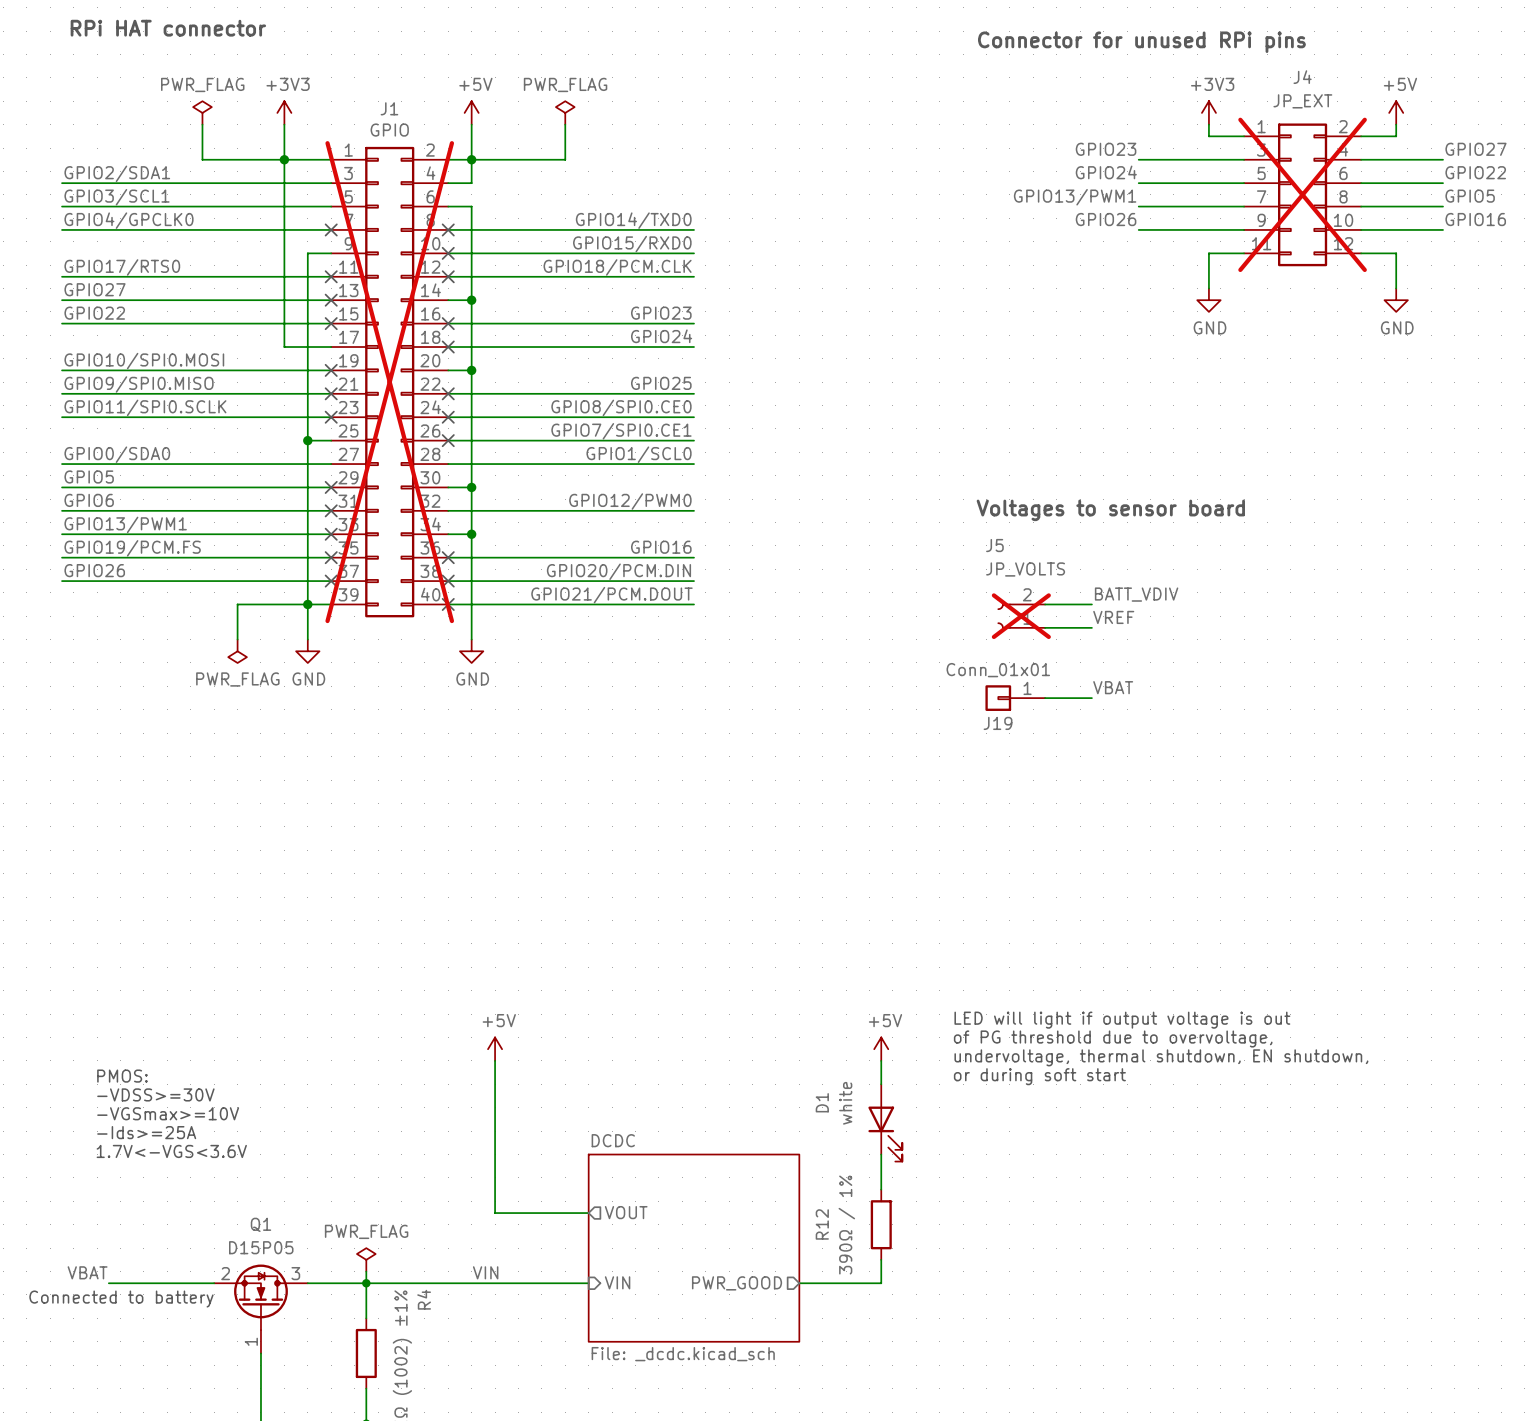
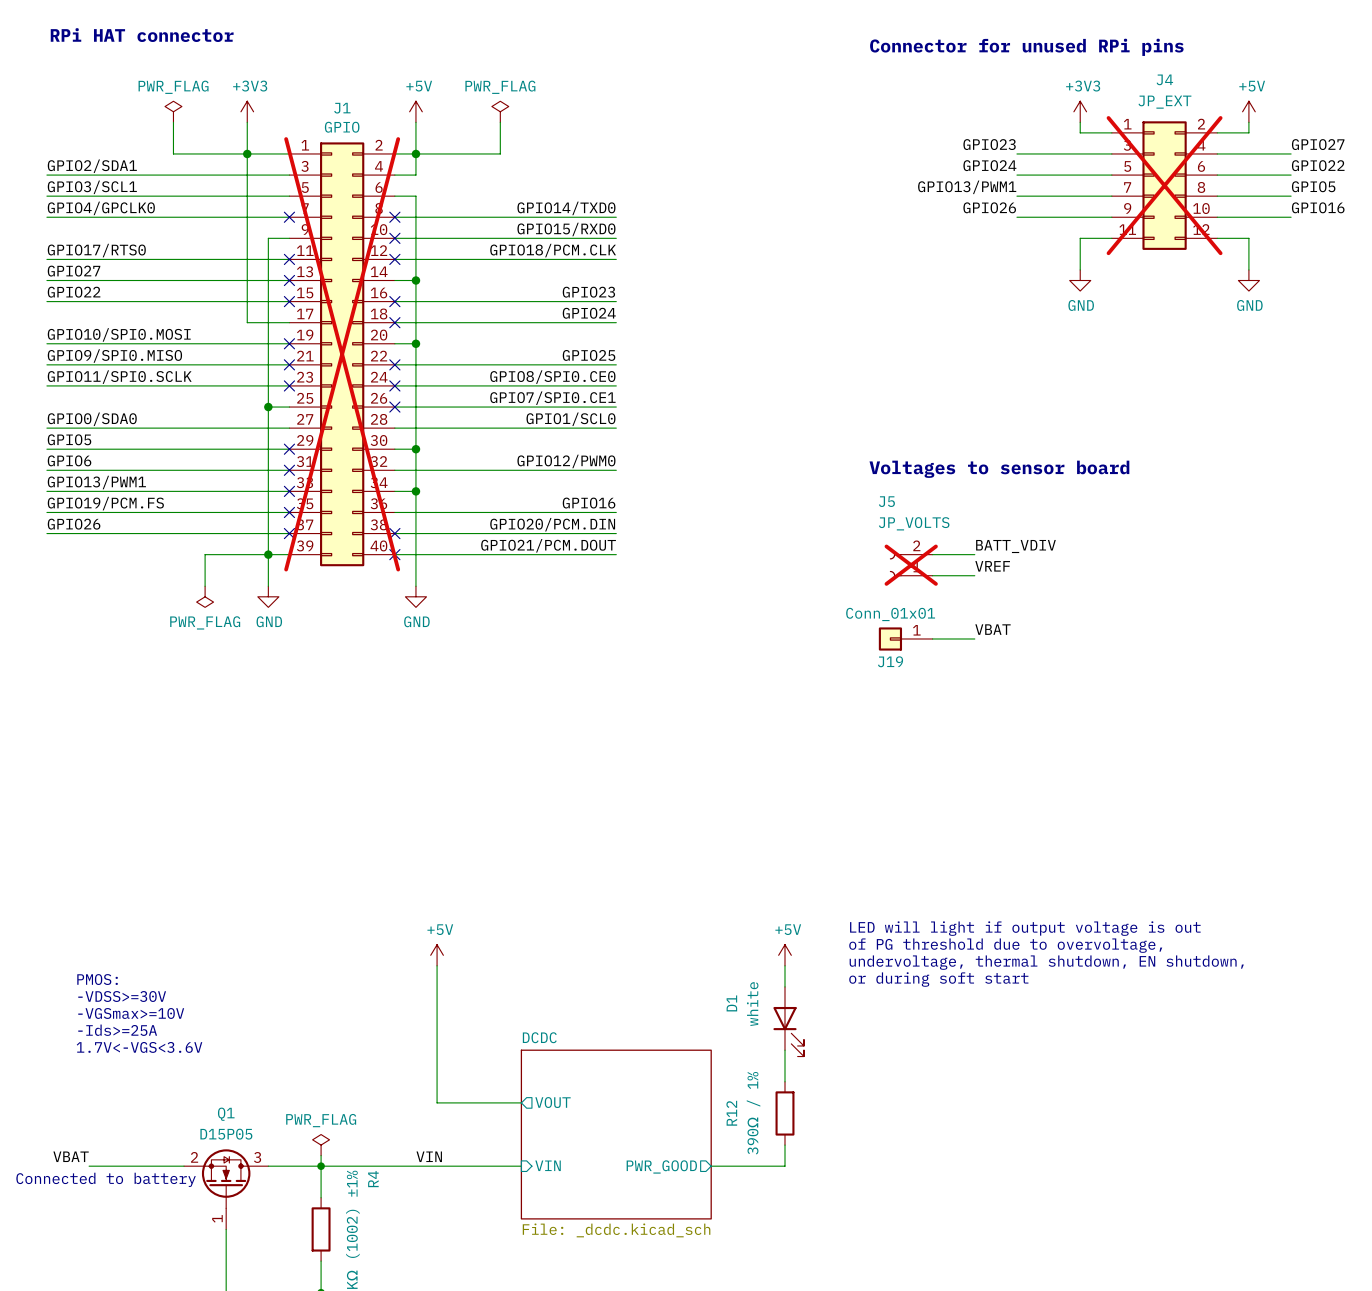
no-connect mark: (448, 557) -> none

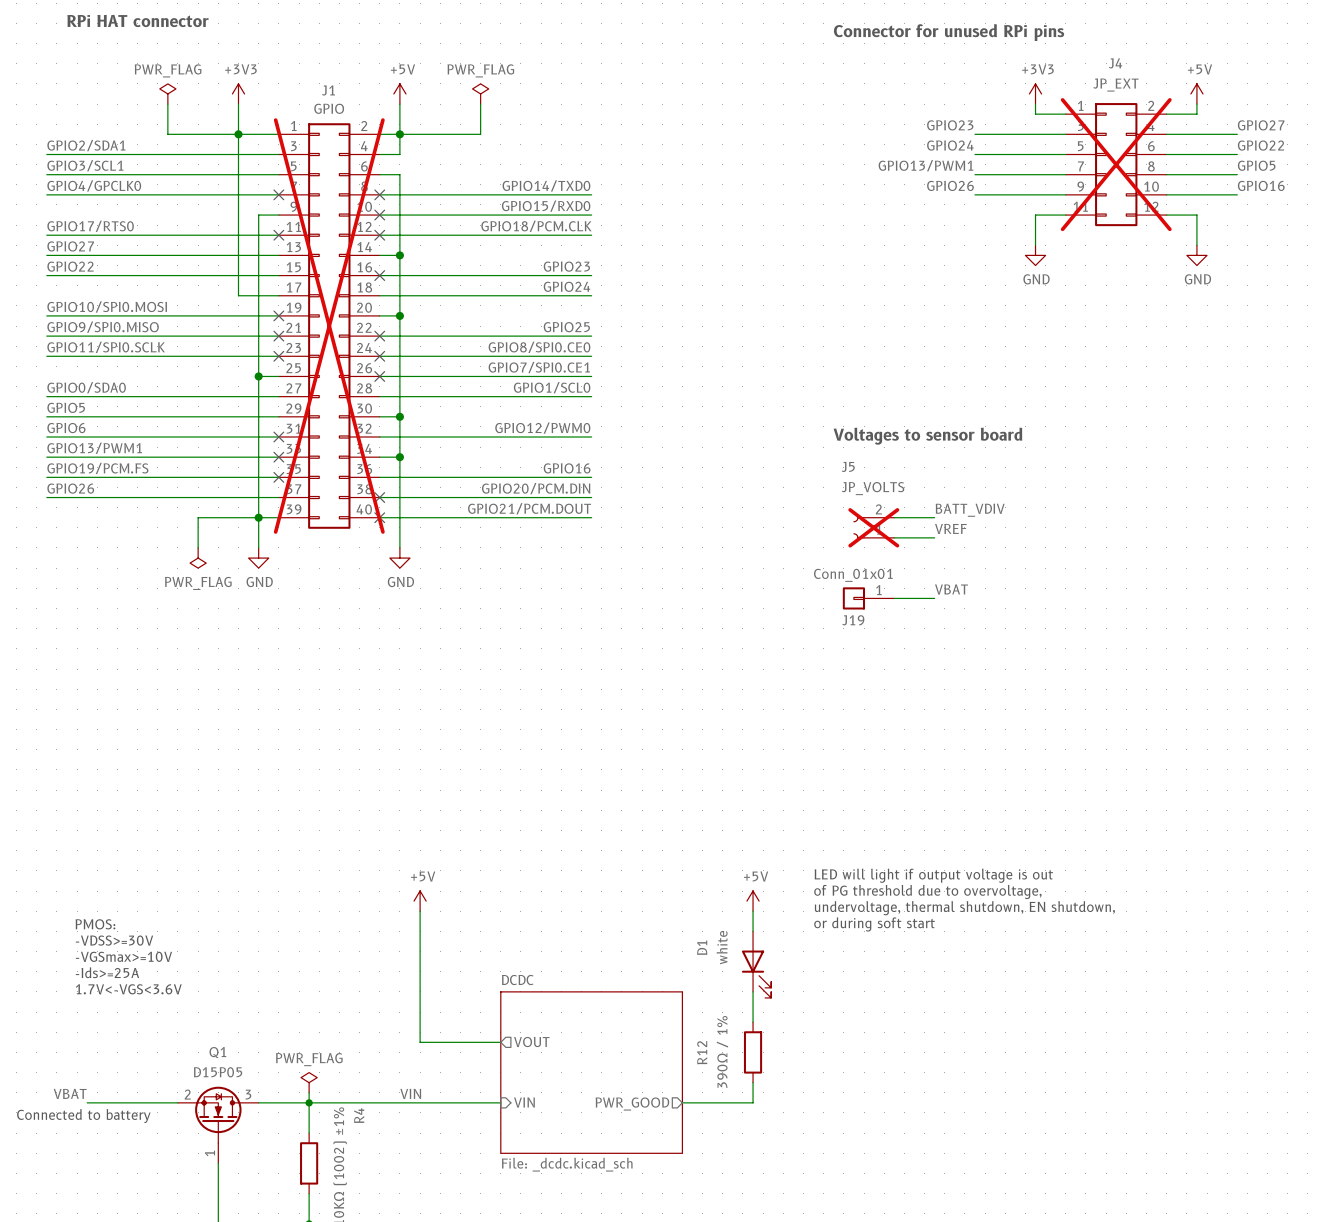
no-connect mark: (289, 280) -> none
no-connect mark: (289, 301) -> none
no-connect mark: (394, 322) -> none
no-connect mark: (289, 449) -> none
no-connect mark: (289, 533) -> none

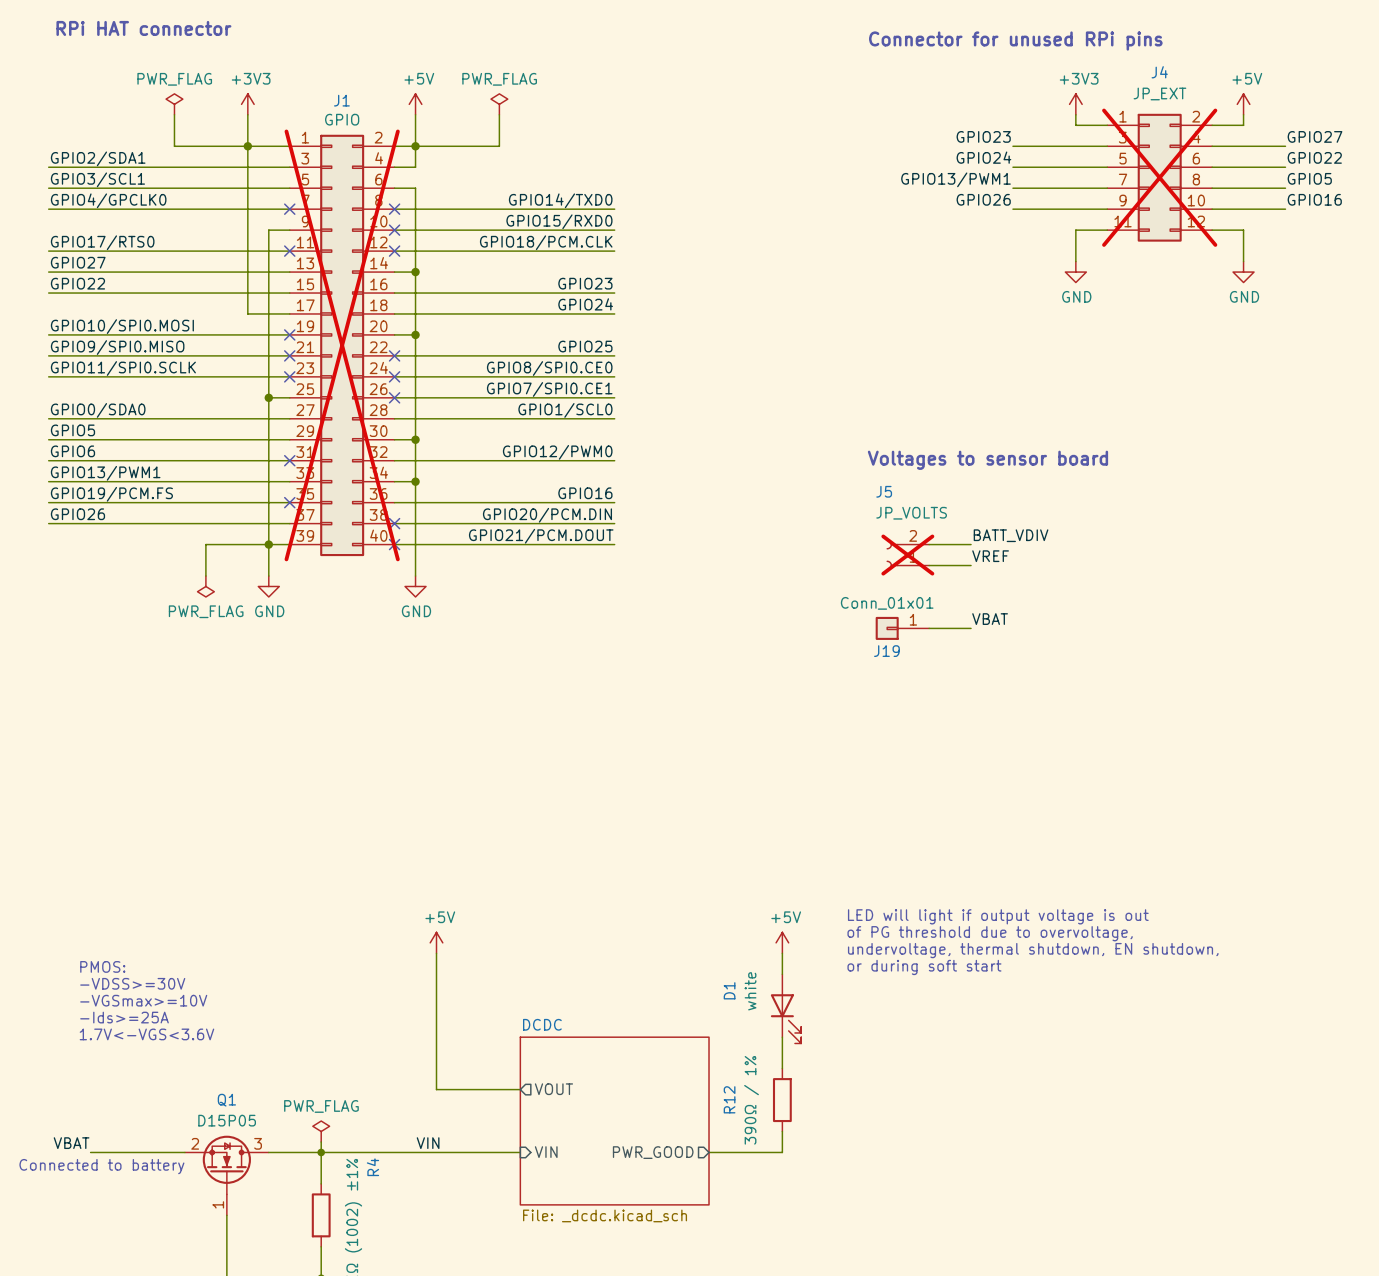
no-connect mark: (379, 275) -> none
no-connect mark: (278, 457) -> none

